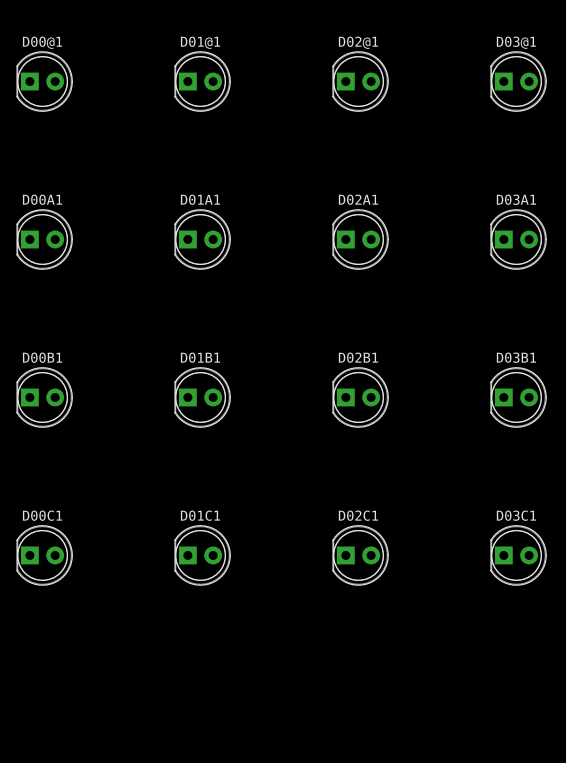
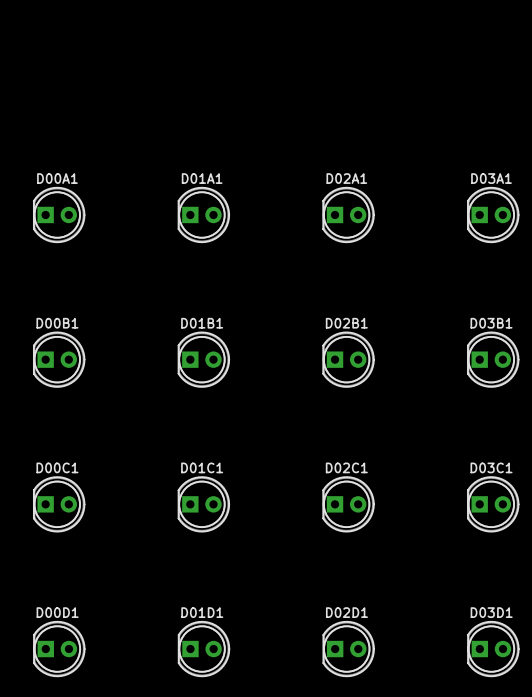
D00@1: (44, 81) -> none
D01@1: (202, 81) -> none
D02@1: (360, 81) -> none
D03@1: (518, 81) -> none
D00D1: none -> (59, 649)
D01D1: none -> (204, 649)
D02D1: none -> (348, 649)
D03D1: none -> (493, 649)

